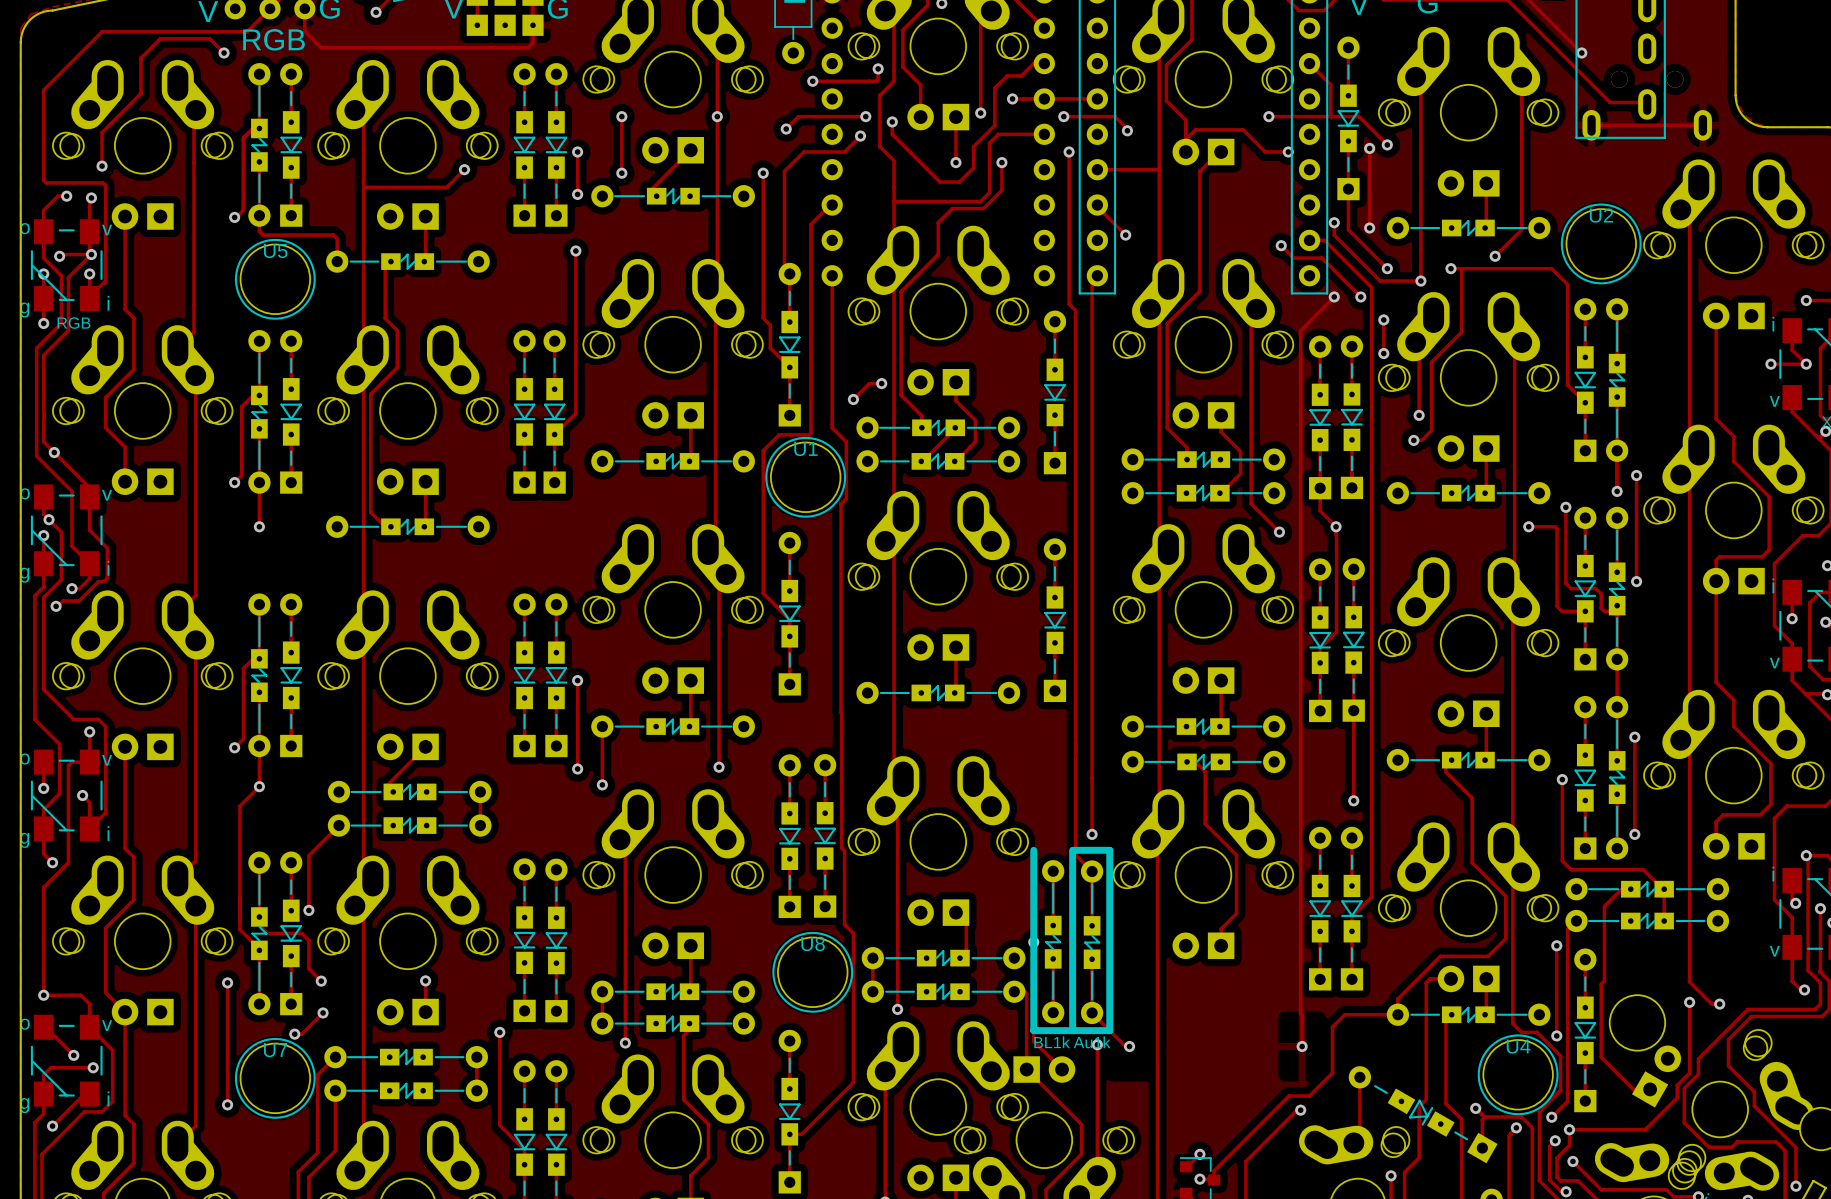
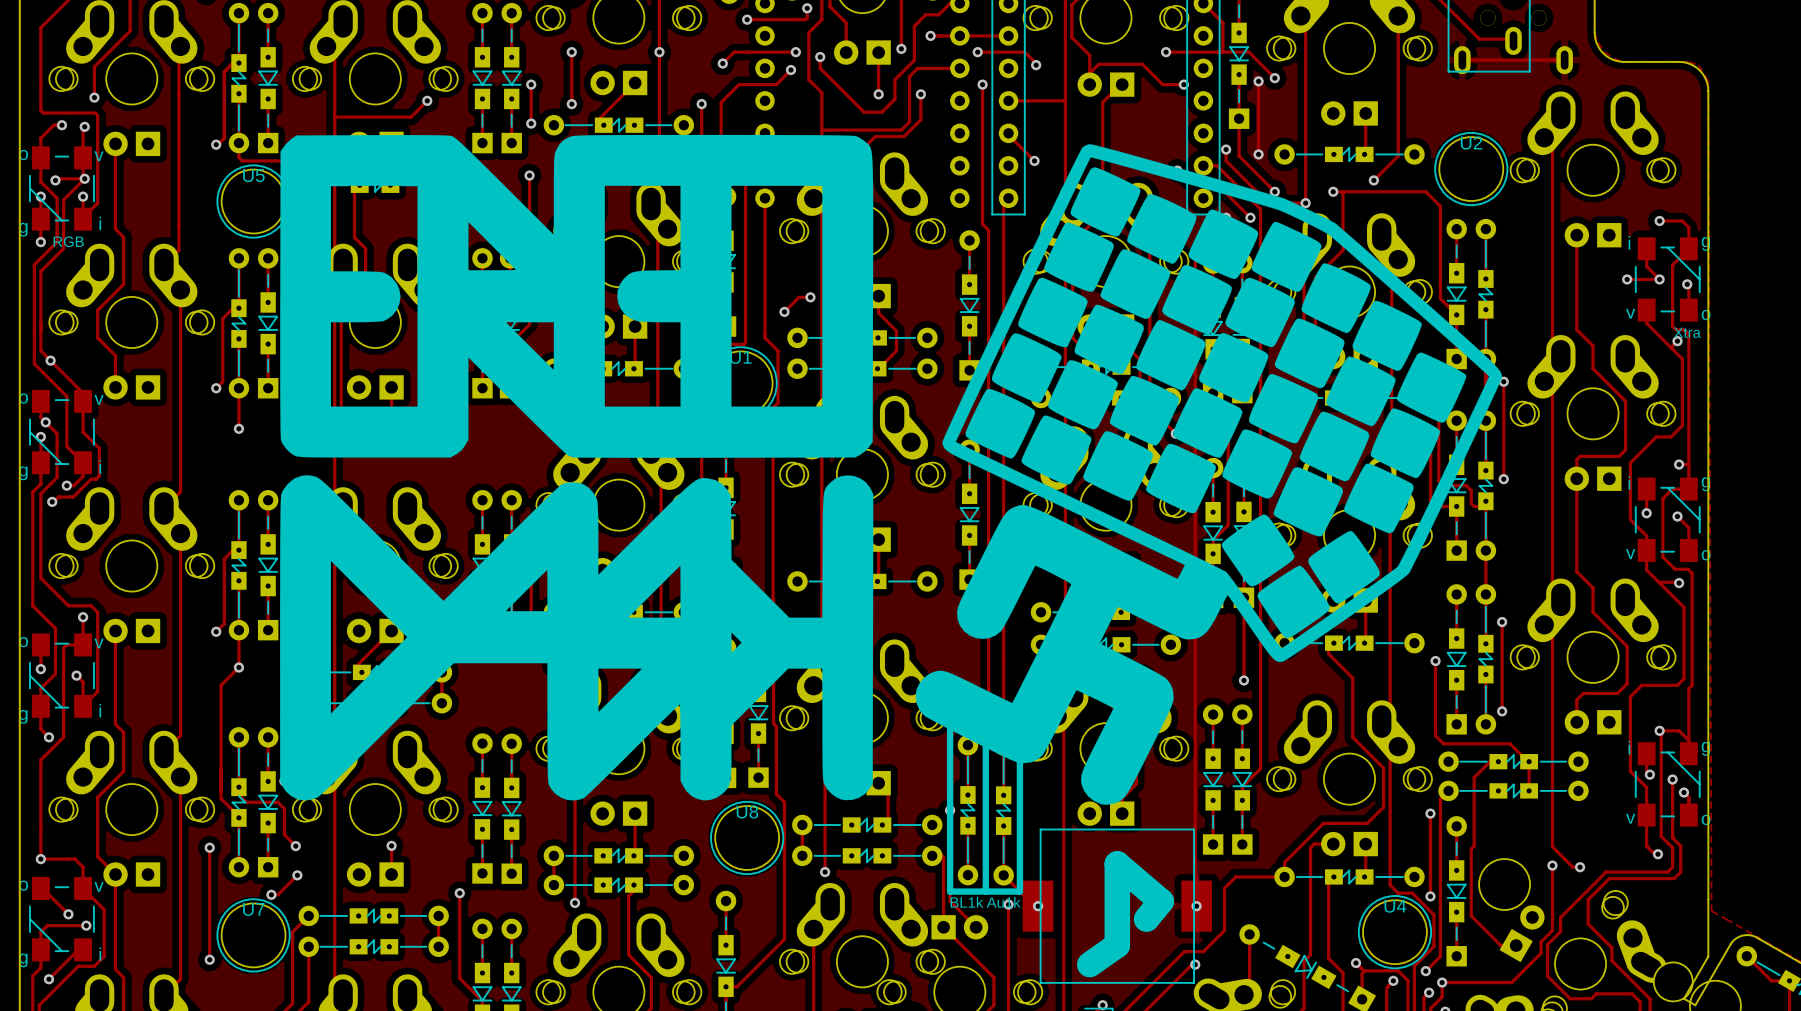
drawing: none -> [280, 134, 1502, 805]
part: none -> (1117, 906)
line: none -> (1146, 919) (1161, 901) (1117, 863) (1117, 945) (1089, 964)

